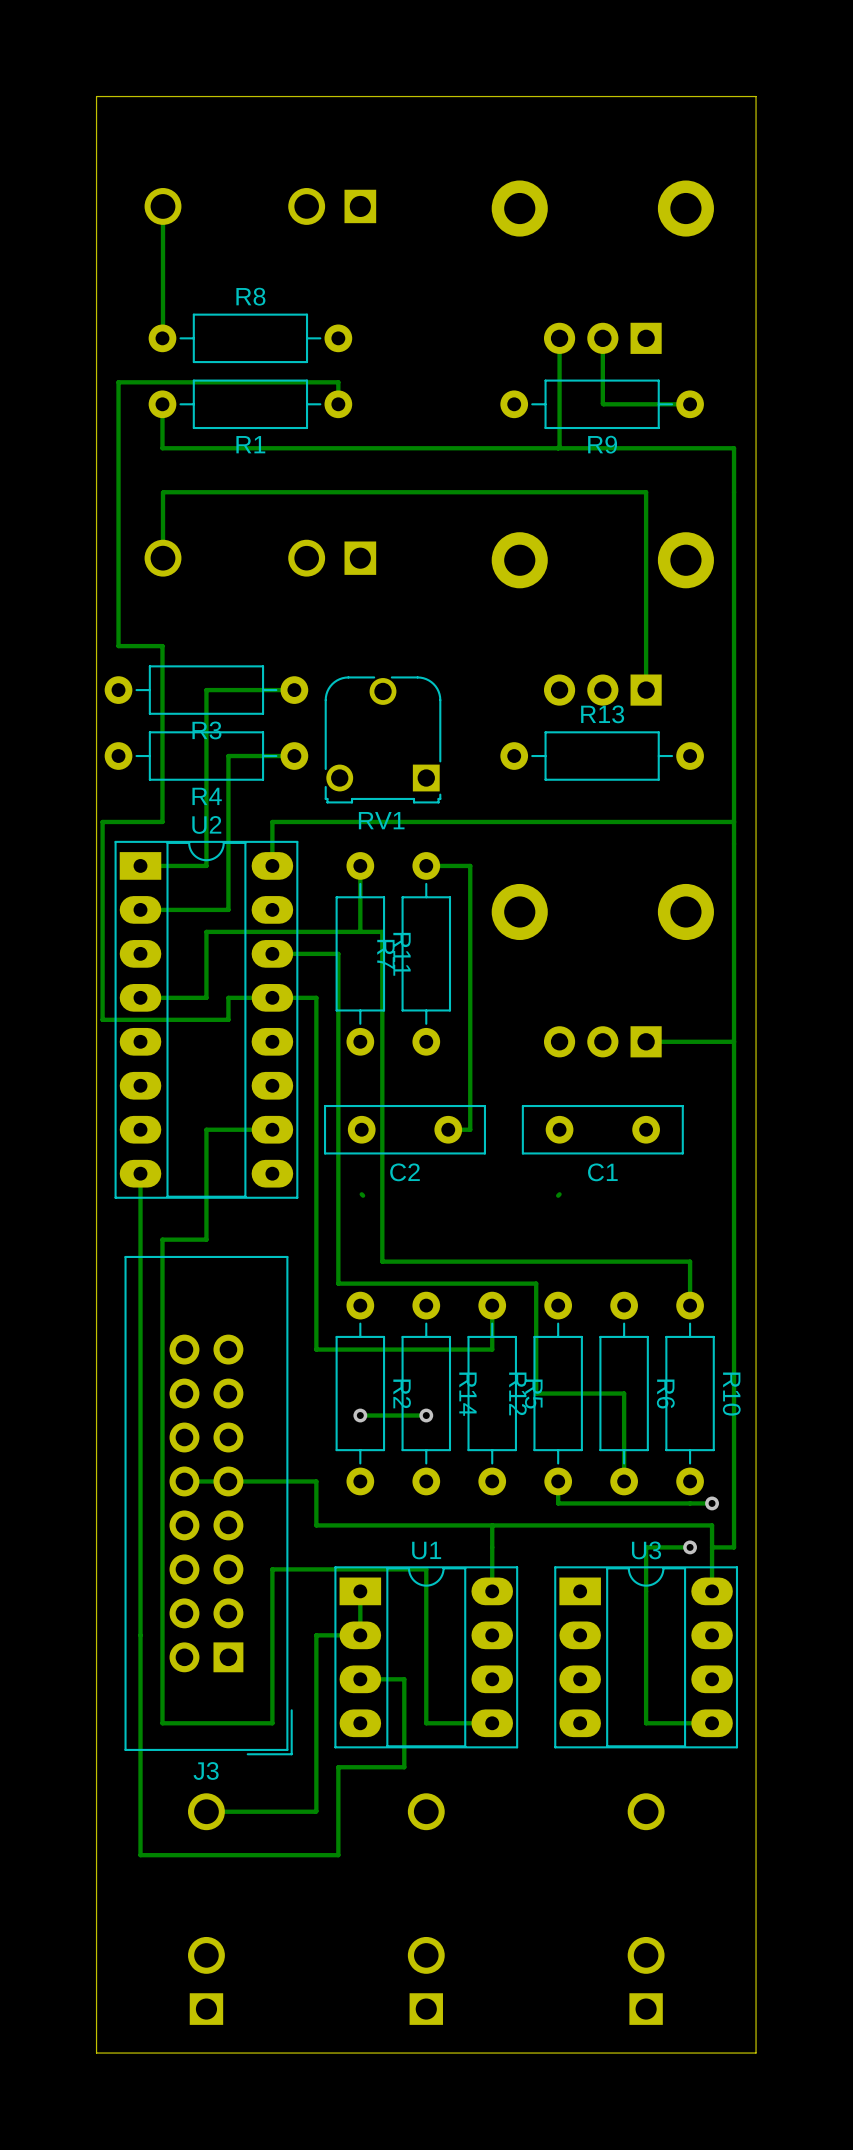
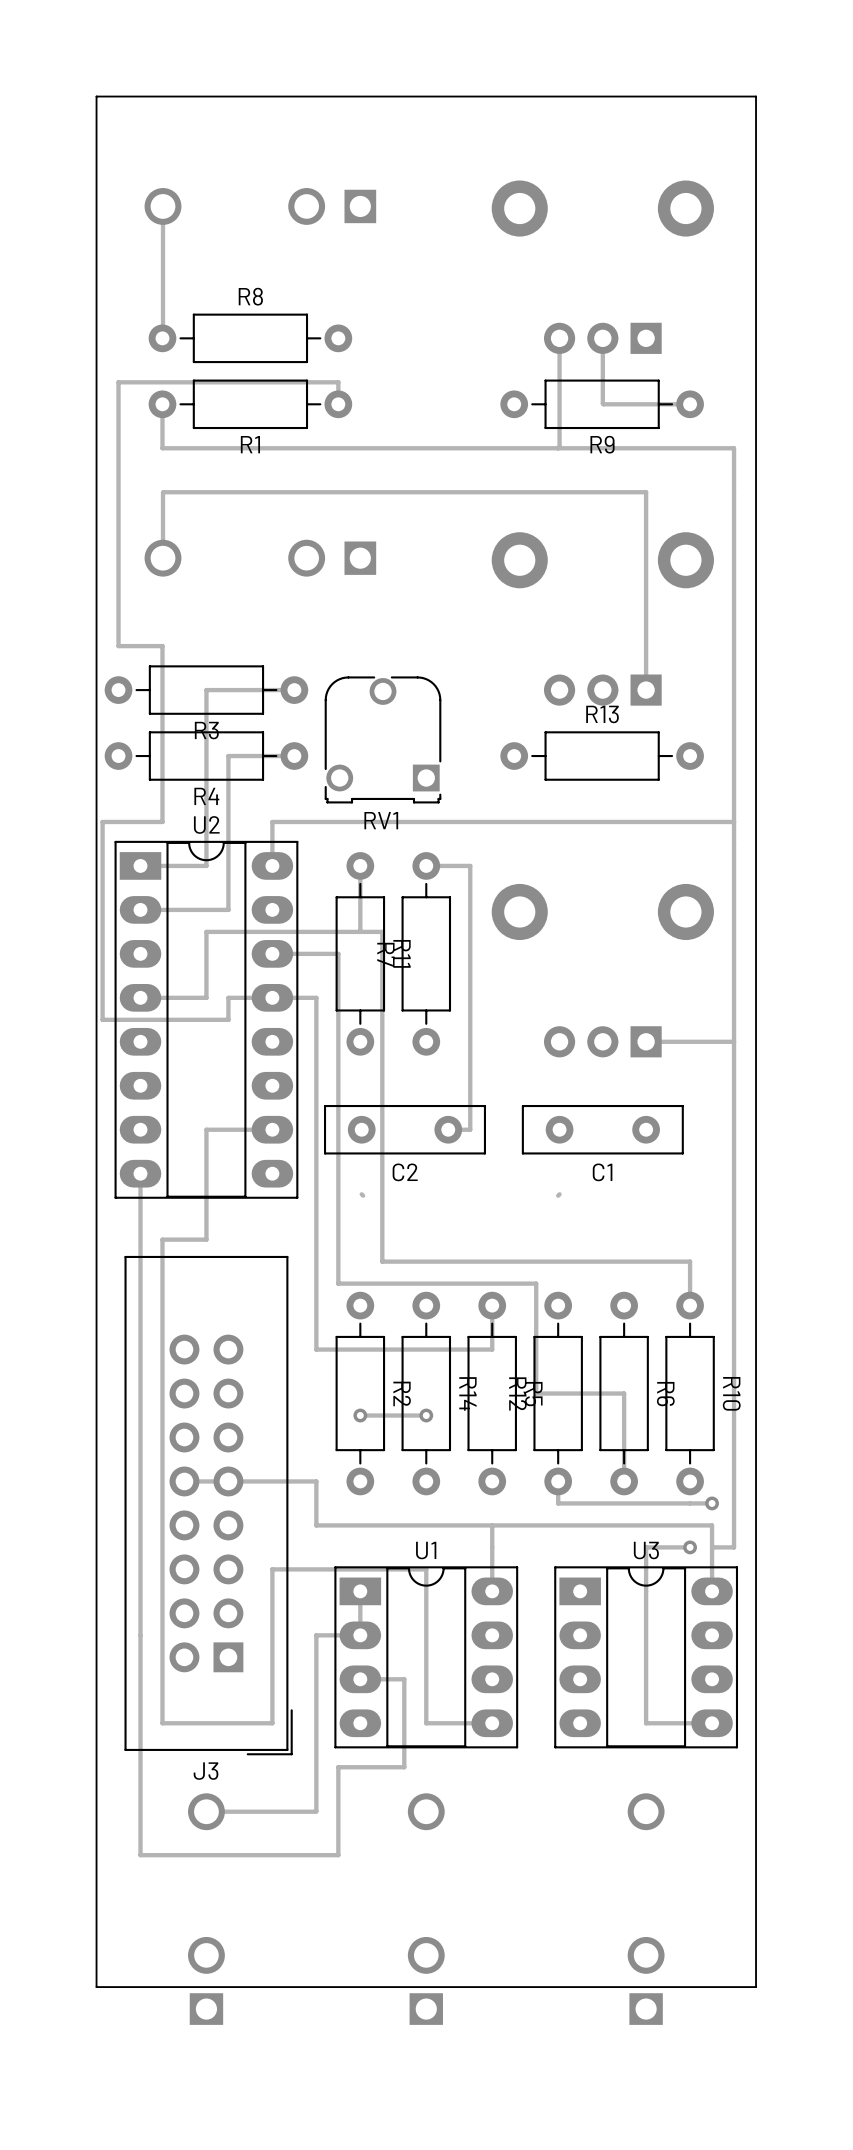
board edge: (756, 1987) (756, 2053) (96, 2053) (96, 1987) -> (756, 1987) (96, 1987)

